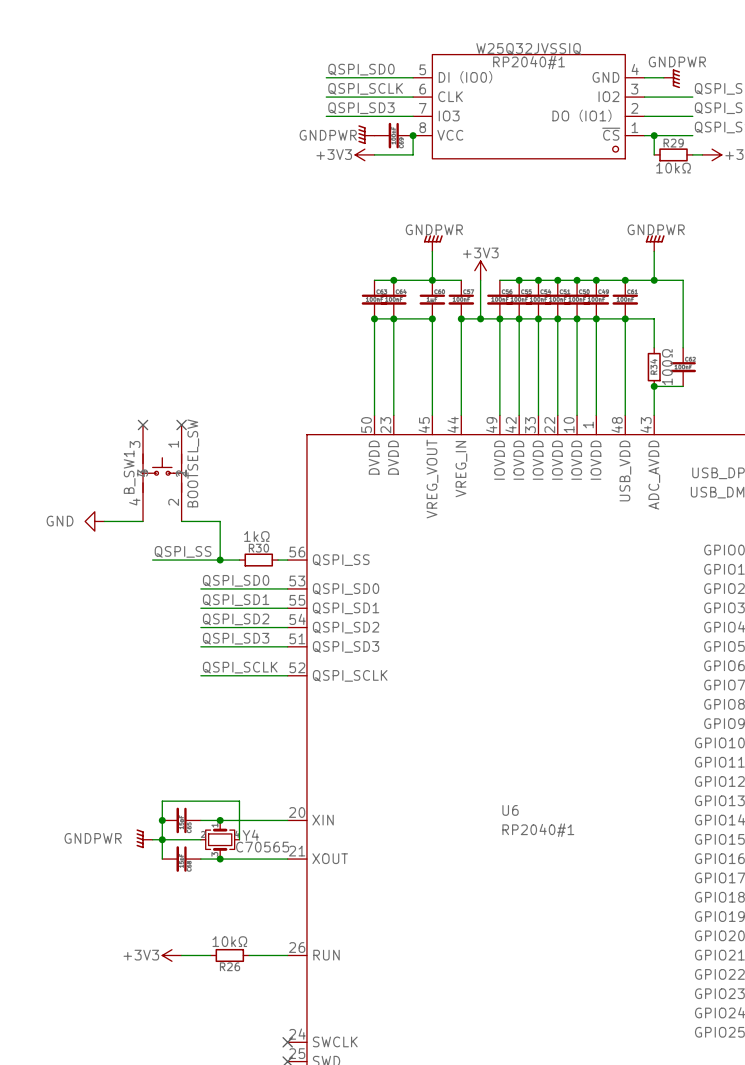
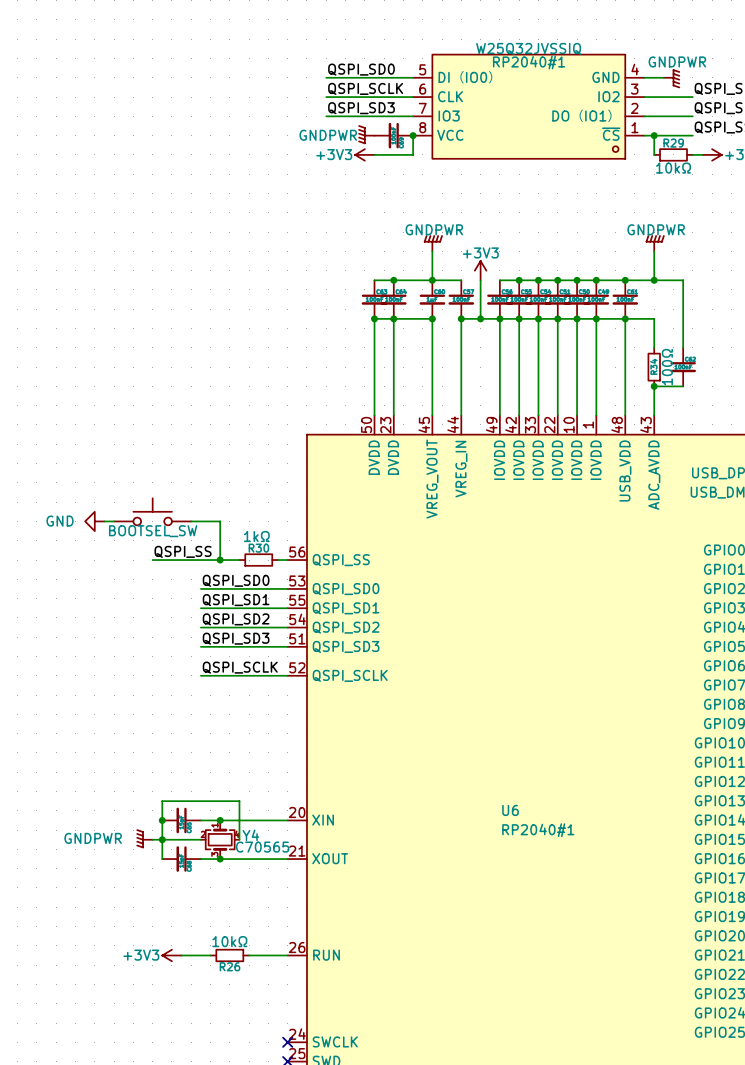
no-connect mark: (143, 424) -> none
no-connect mark: (181, 424) -> none
B_SW1: BOOTSEL_SW (162, 473) -> none
part: none -> BOOTSEL_SW (152, 511)

